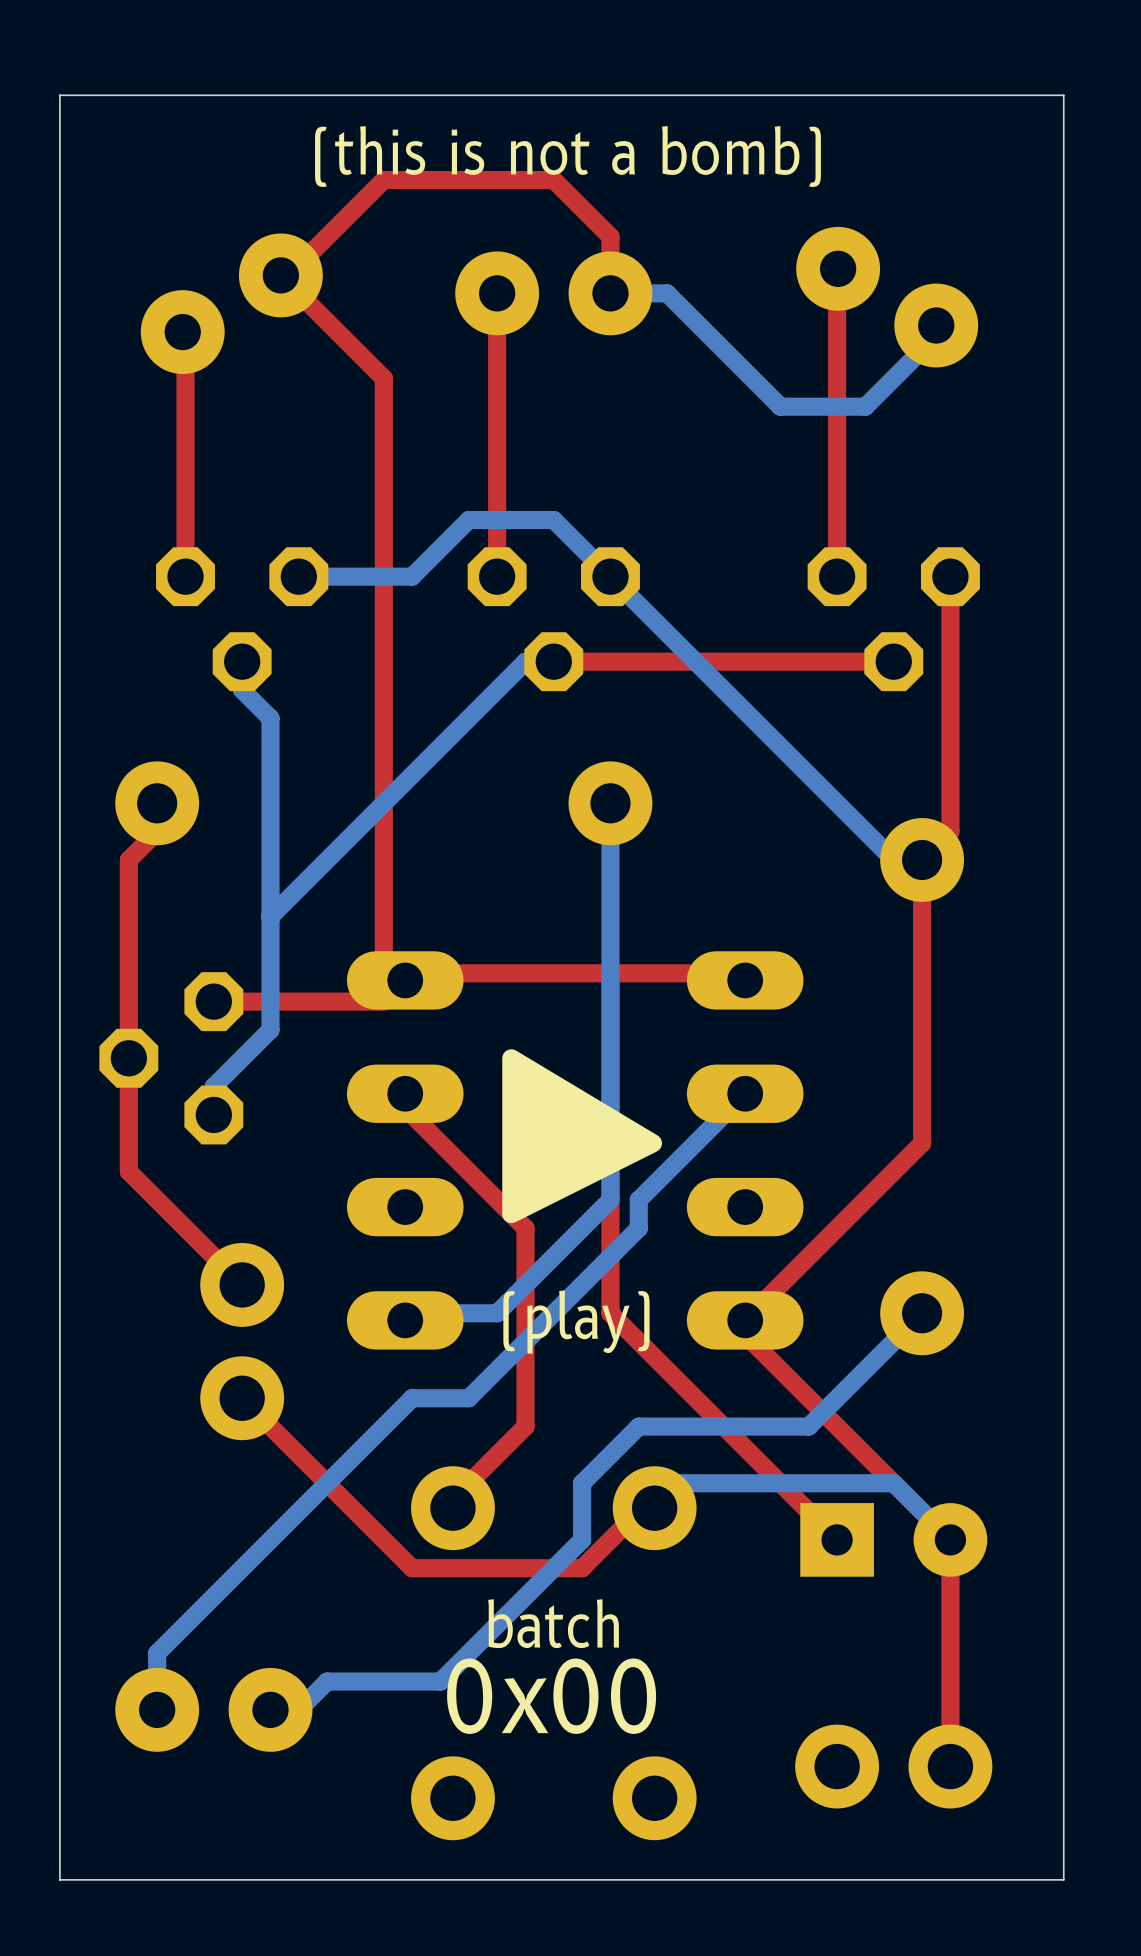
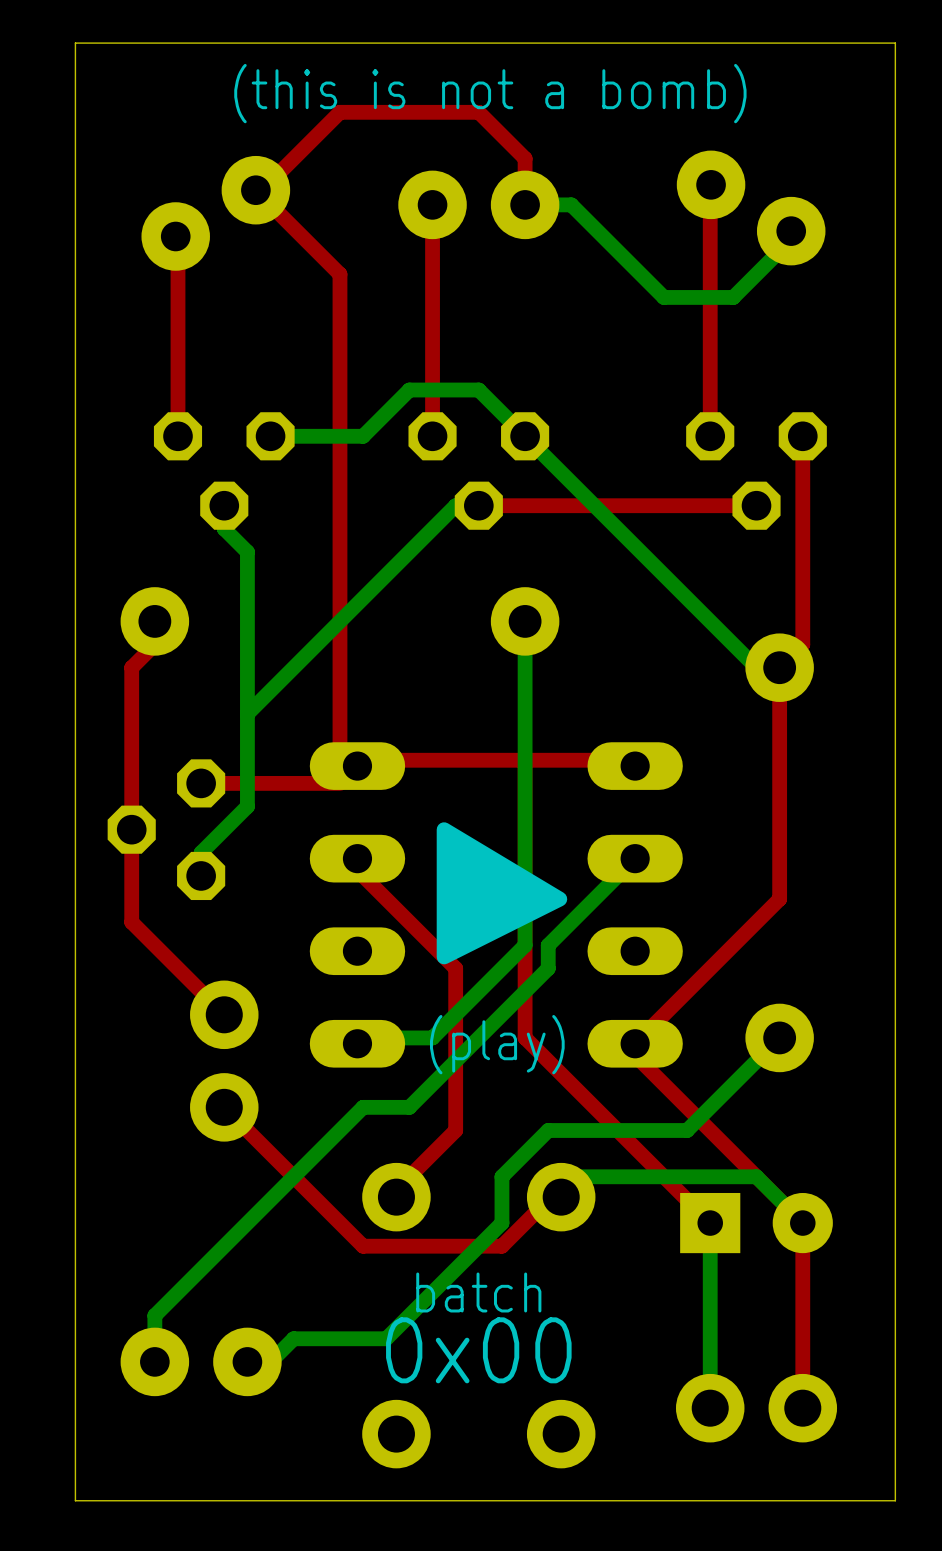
bottom track: none -> (710, 1223) (710, 1408)

